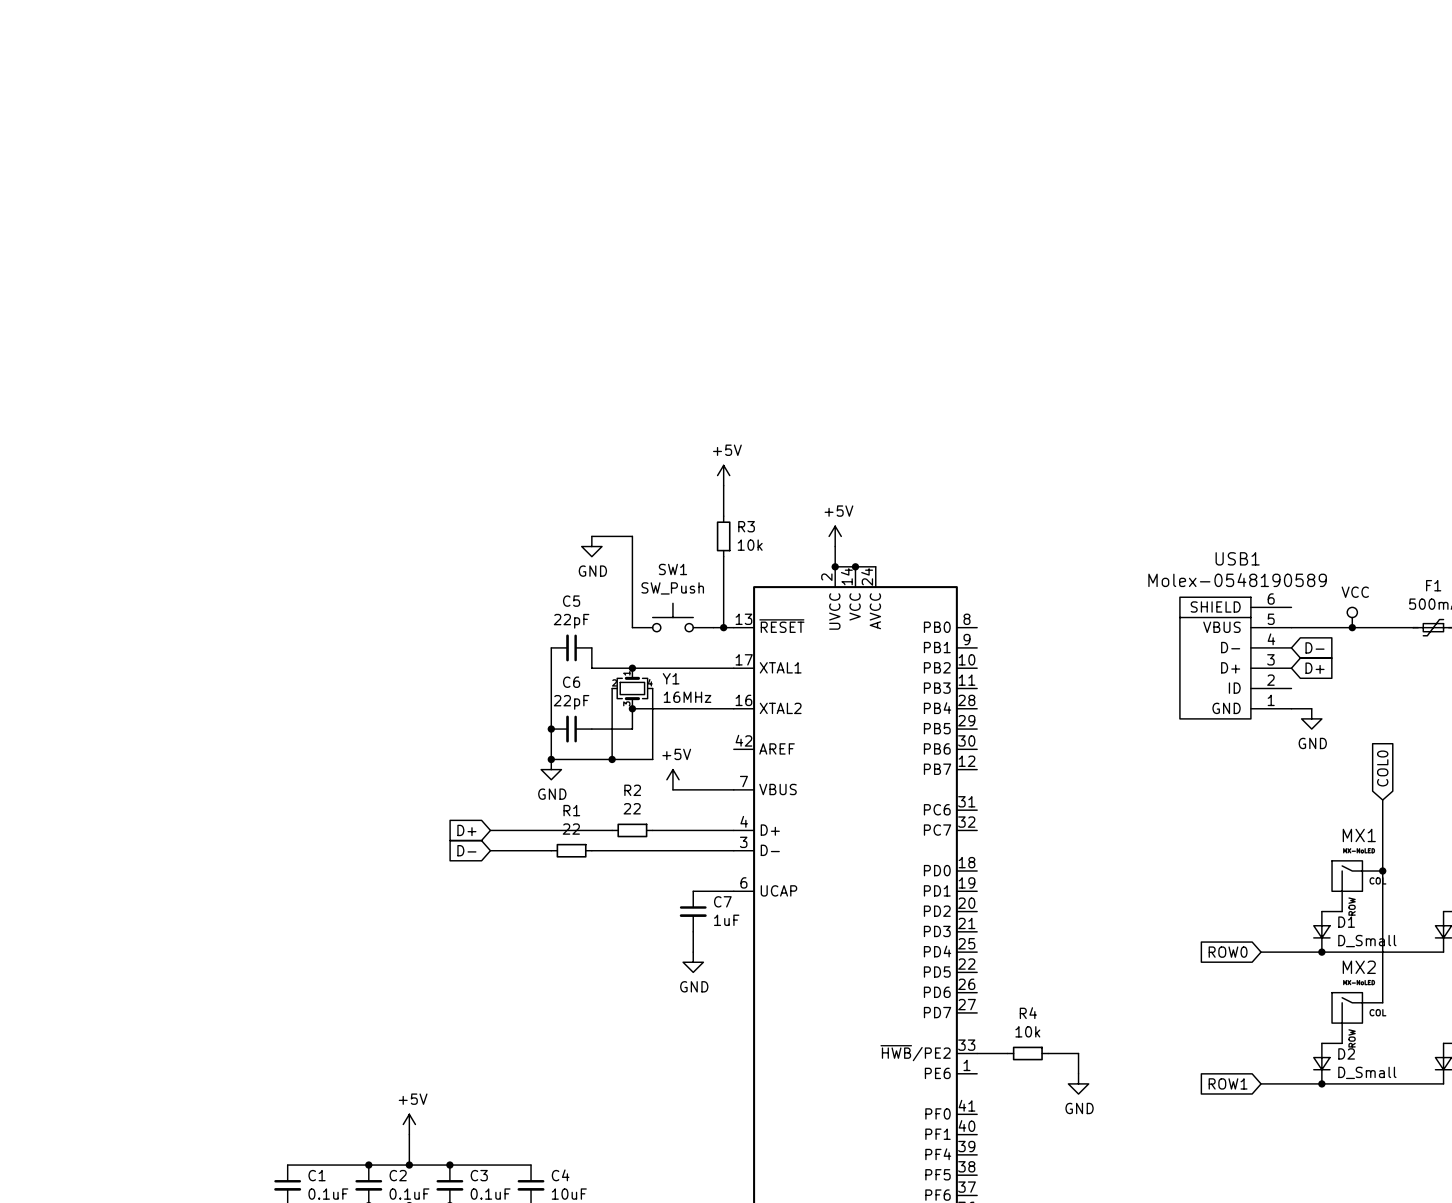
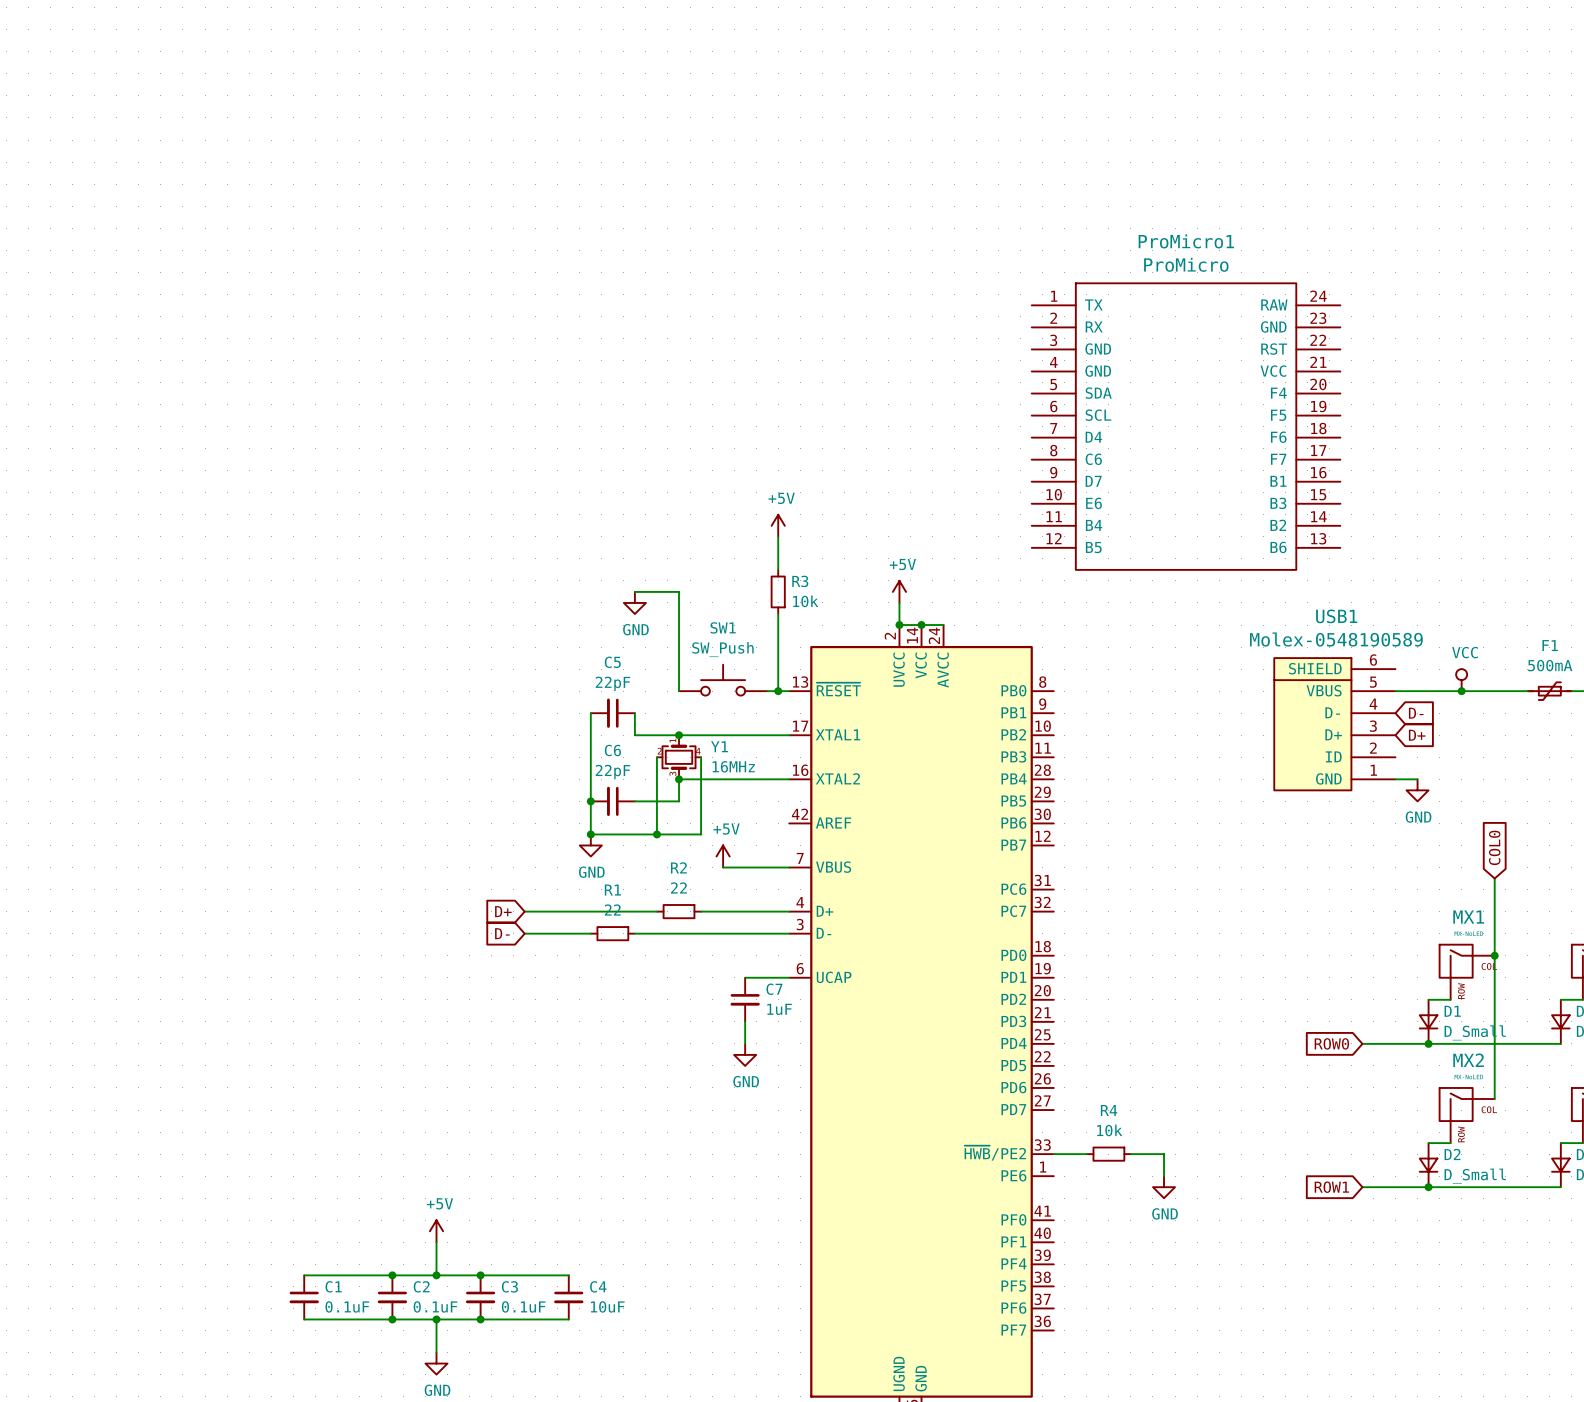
ProMicro1: none -> ProMicro (1186, 426)

